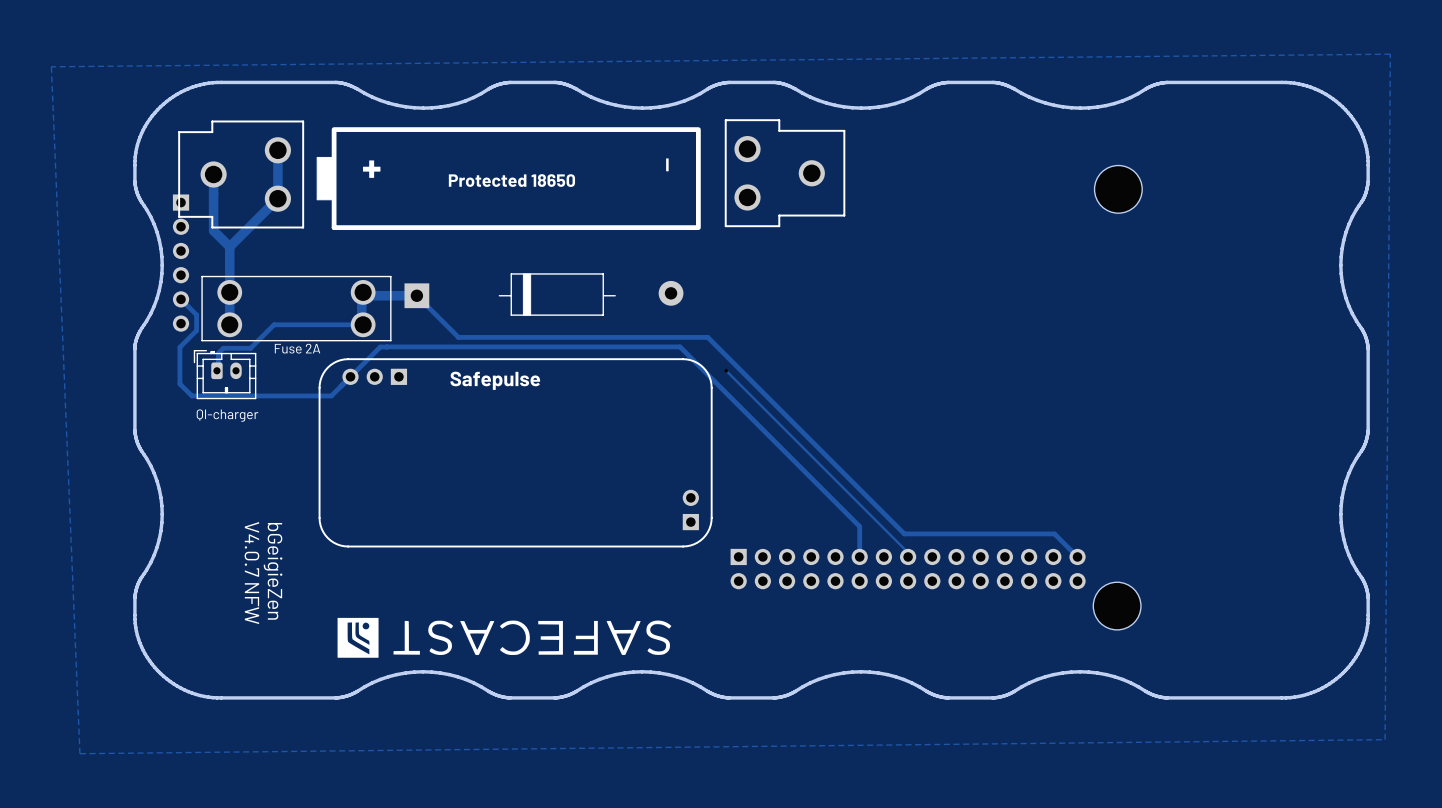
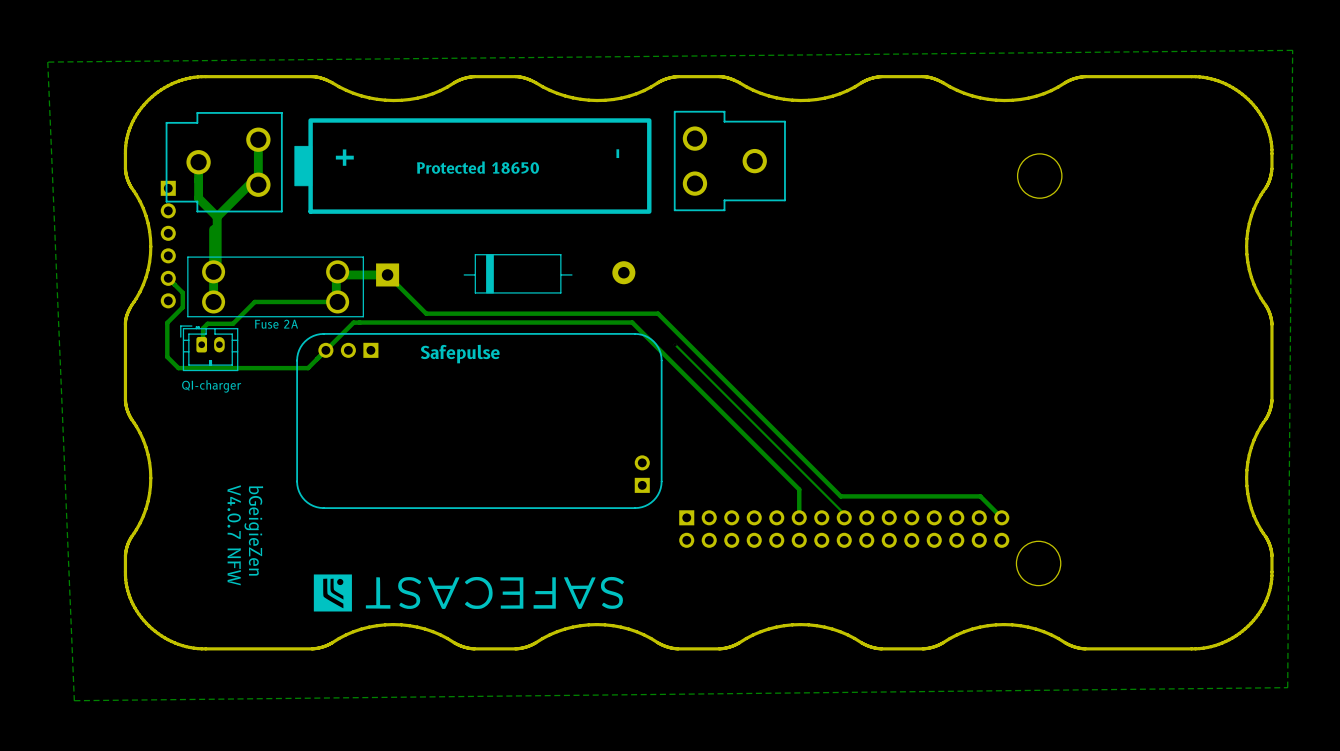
track: none -> (249, 184) (217, 216)
track: (277, 198) (229, 246) (213, 230) (213, 213) -> (217, 216) (198, 198)
track: none -> (217, 216) (217, 262)

